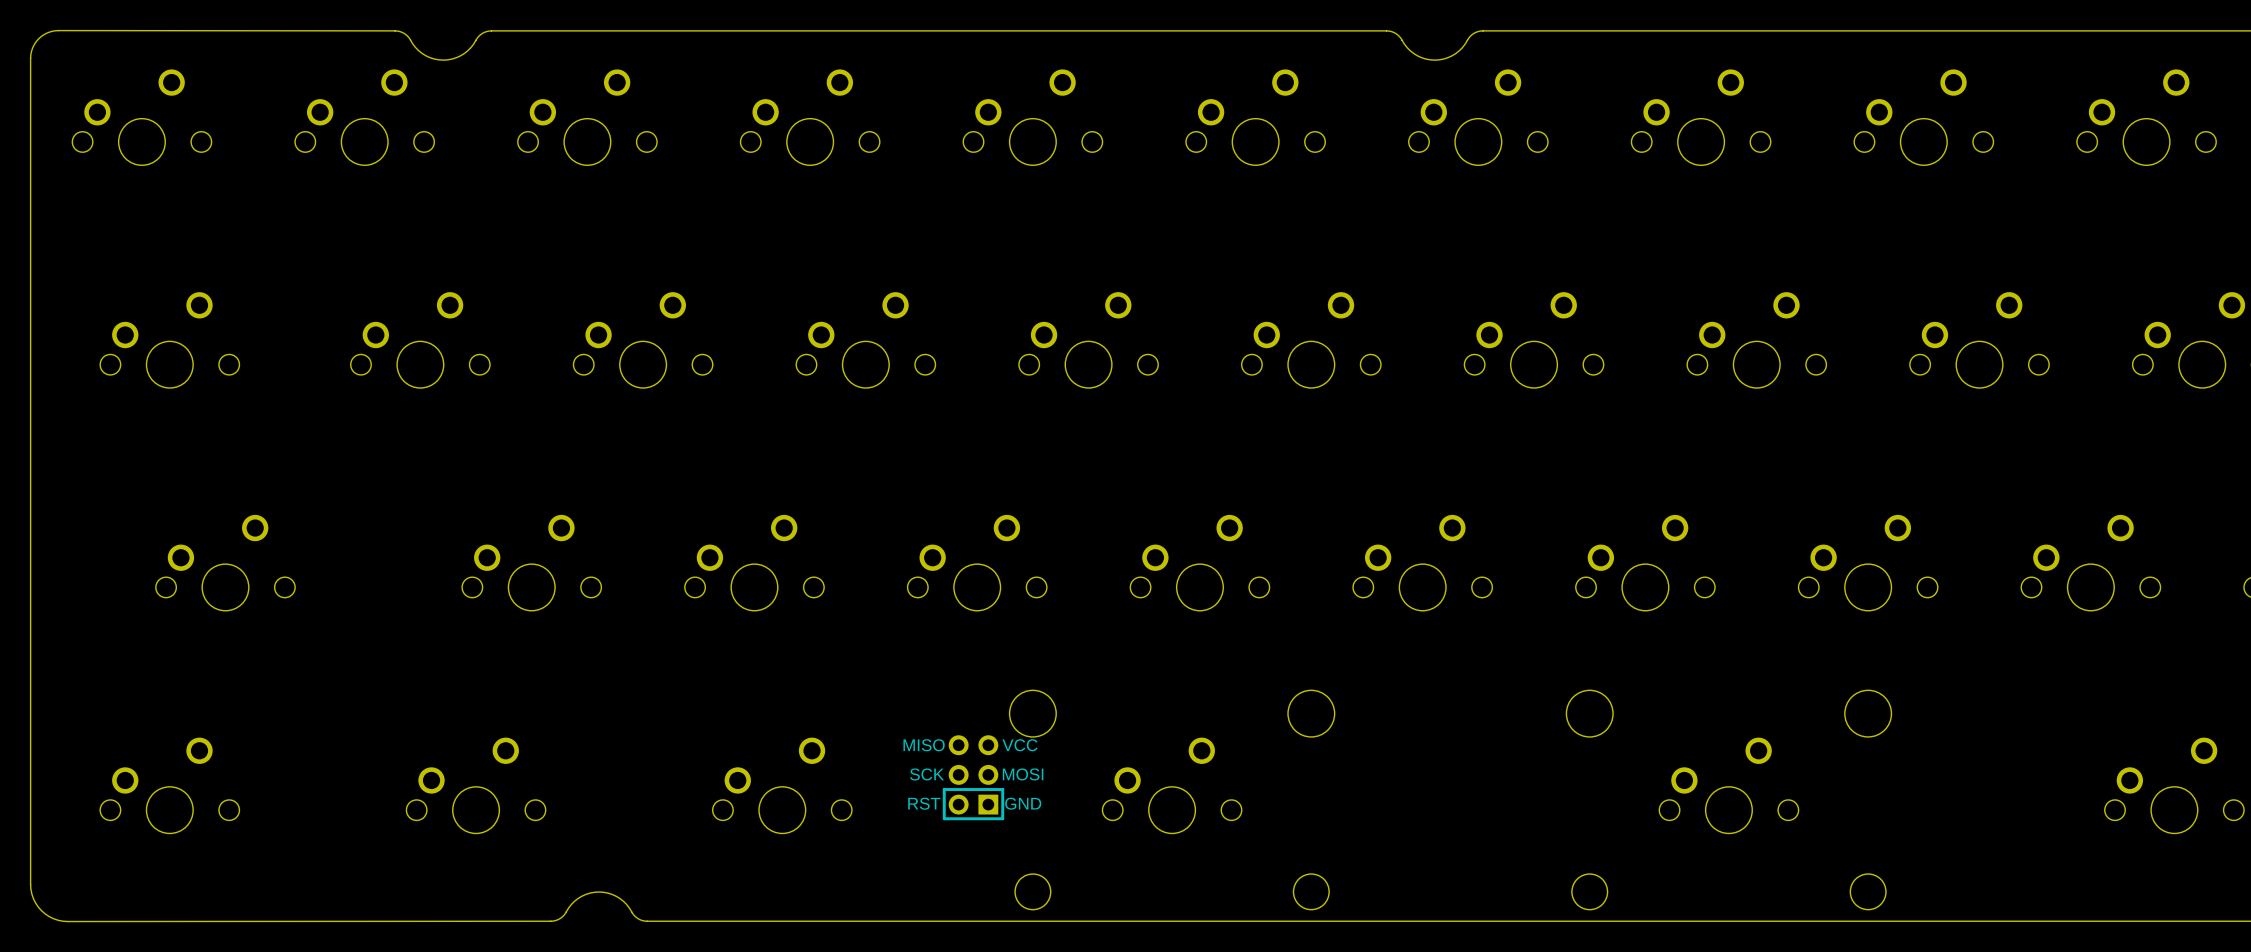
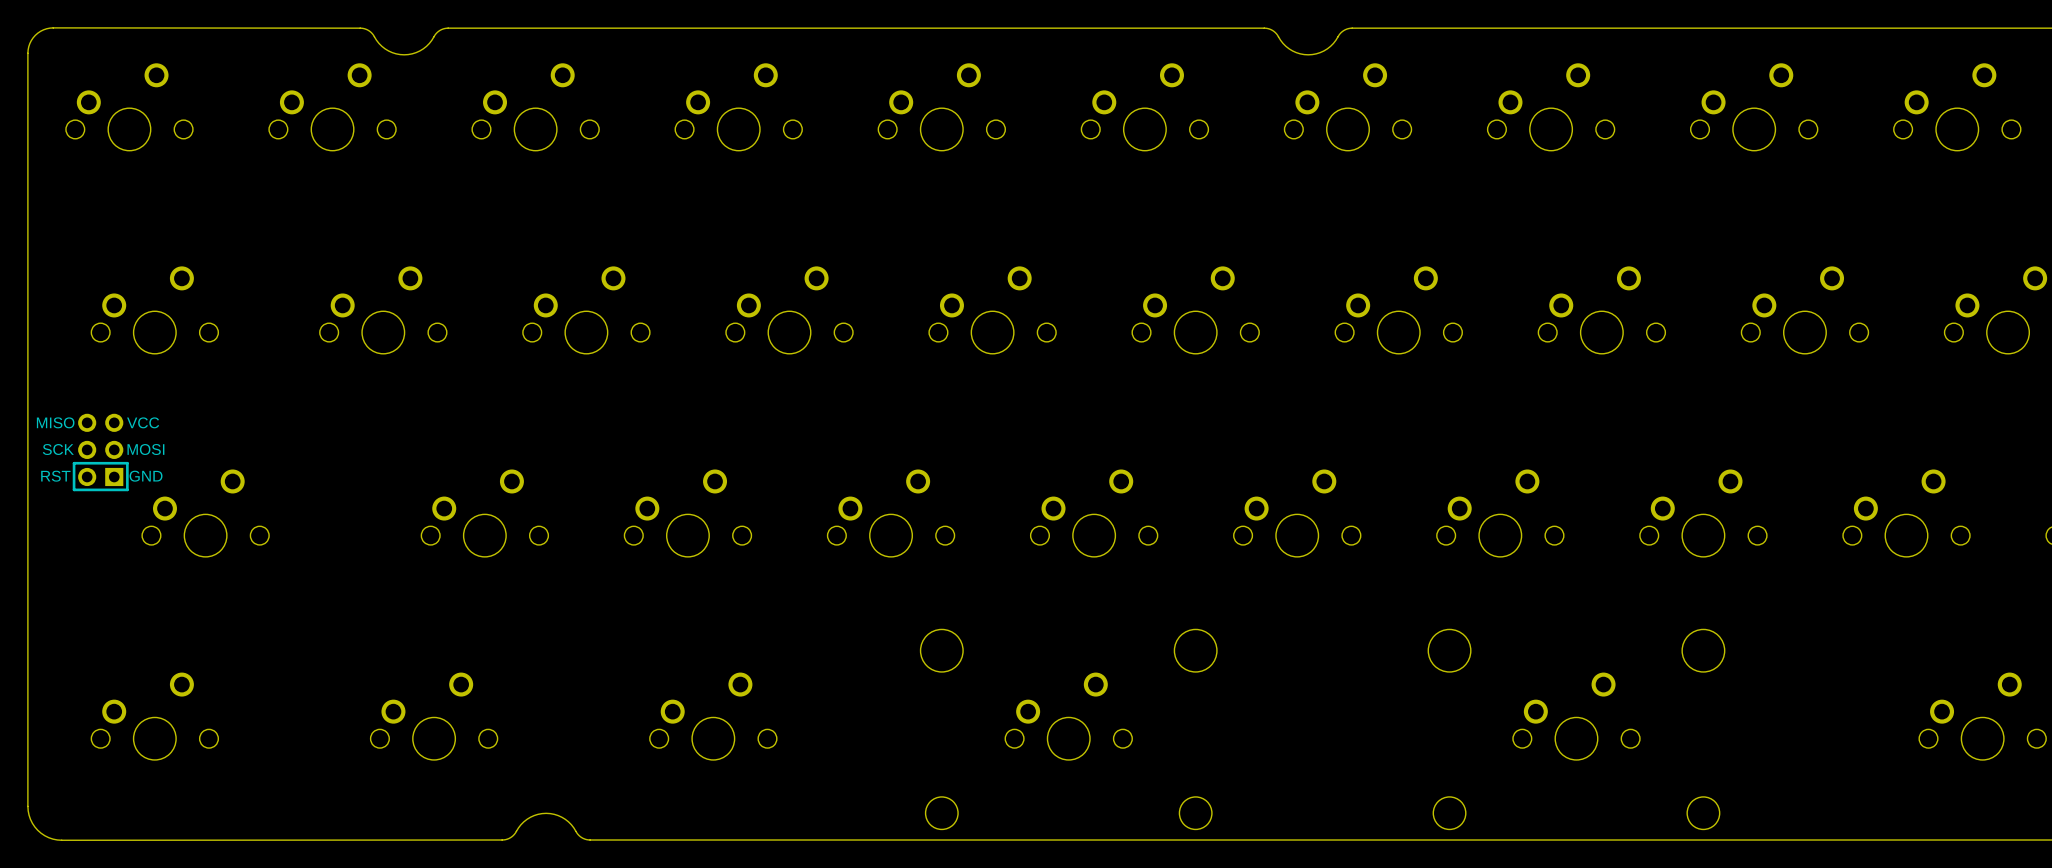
part: none -> (100, 452)
part: (973, 777) -> none

